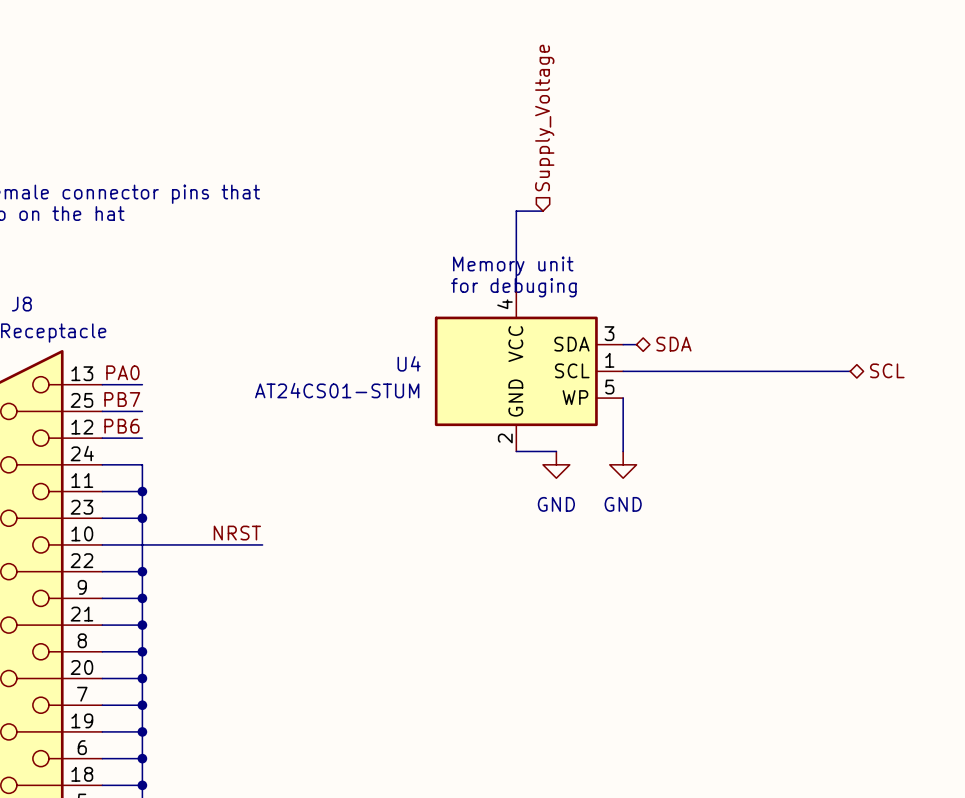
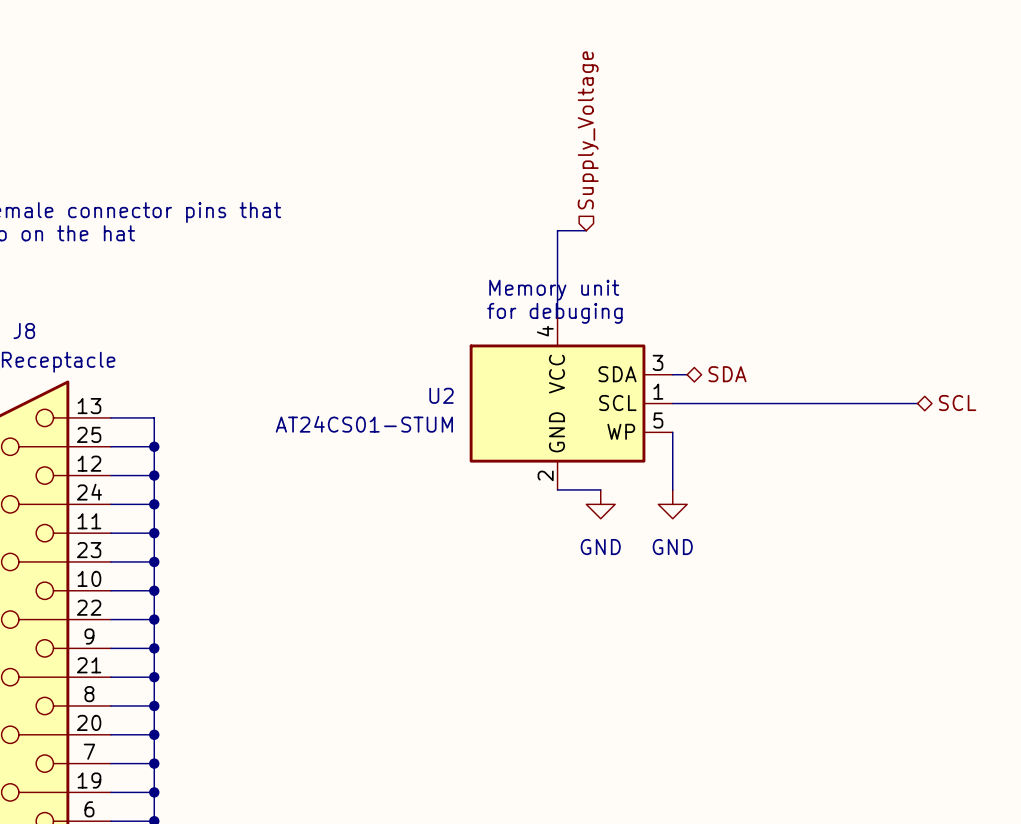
U4 name: U4 (409, 363) -> U2 (441, 395)
label: PA0 (122, 372) -> none
wire: none -> (154, 417) (154, 504)
label: PB7 (122, 399) -> none
junction: none -> (154, 446)
label: PB6 (121, 426) -> none
junction: none -> (154, 475)
junction: none -> (154, 504)
label: NRST (237, 533) -> none
wire: (142, 544) (262, 544) -> none
junction: none -> (154, 590)

